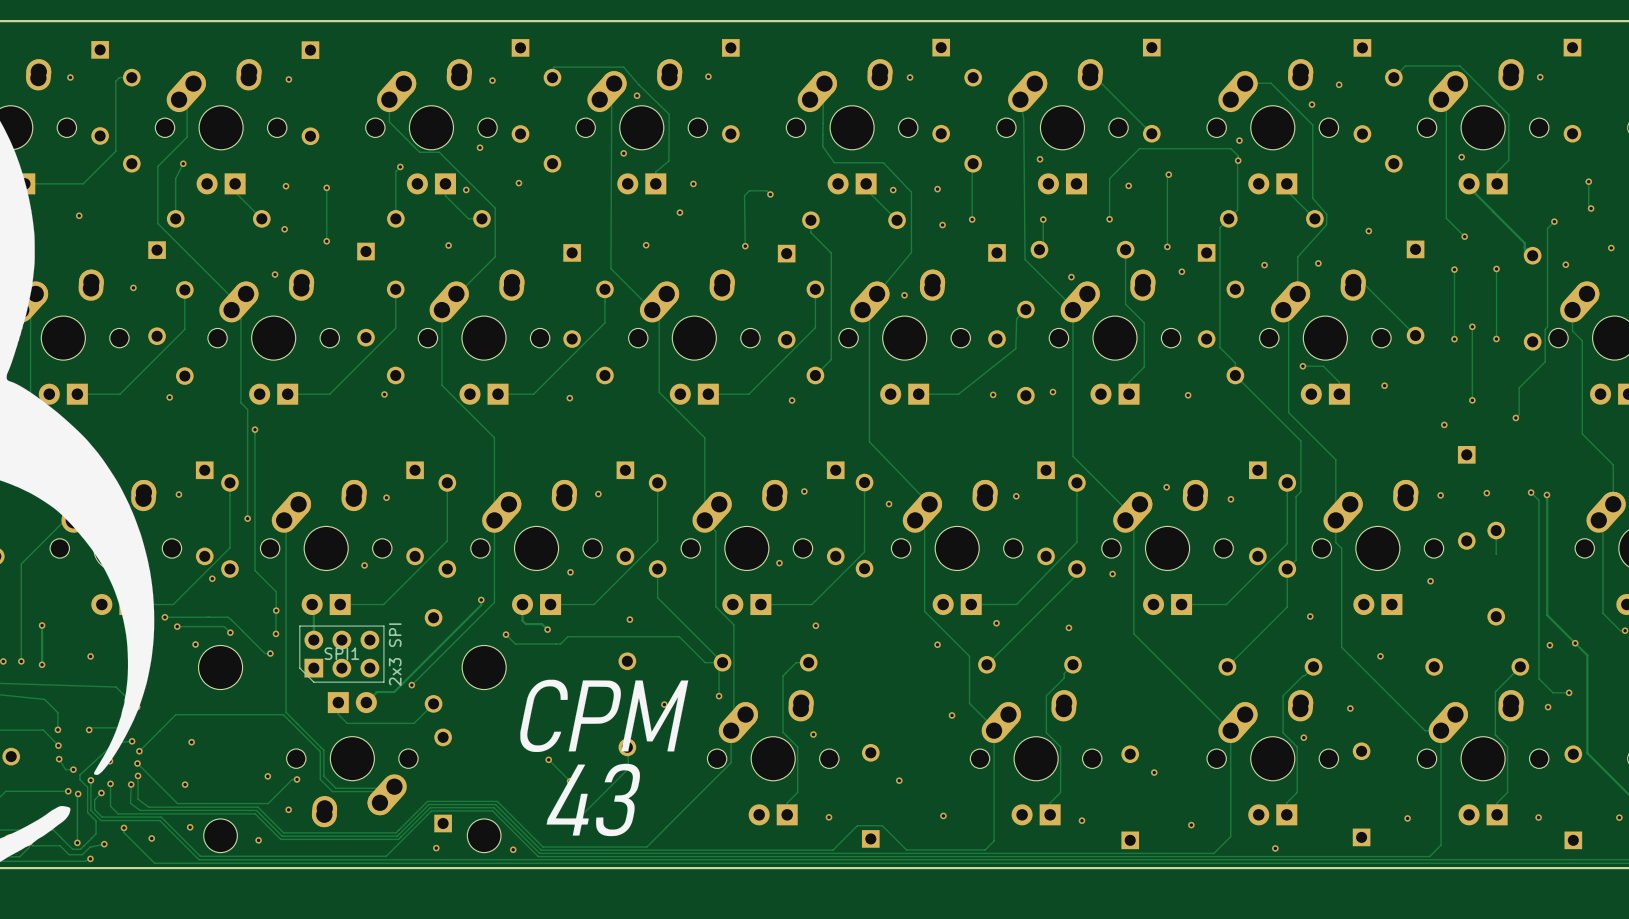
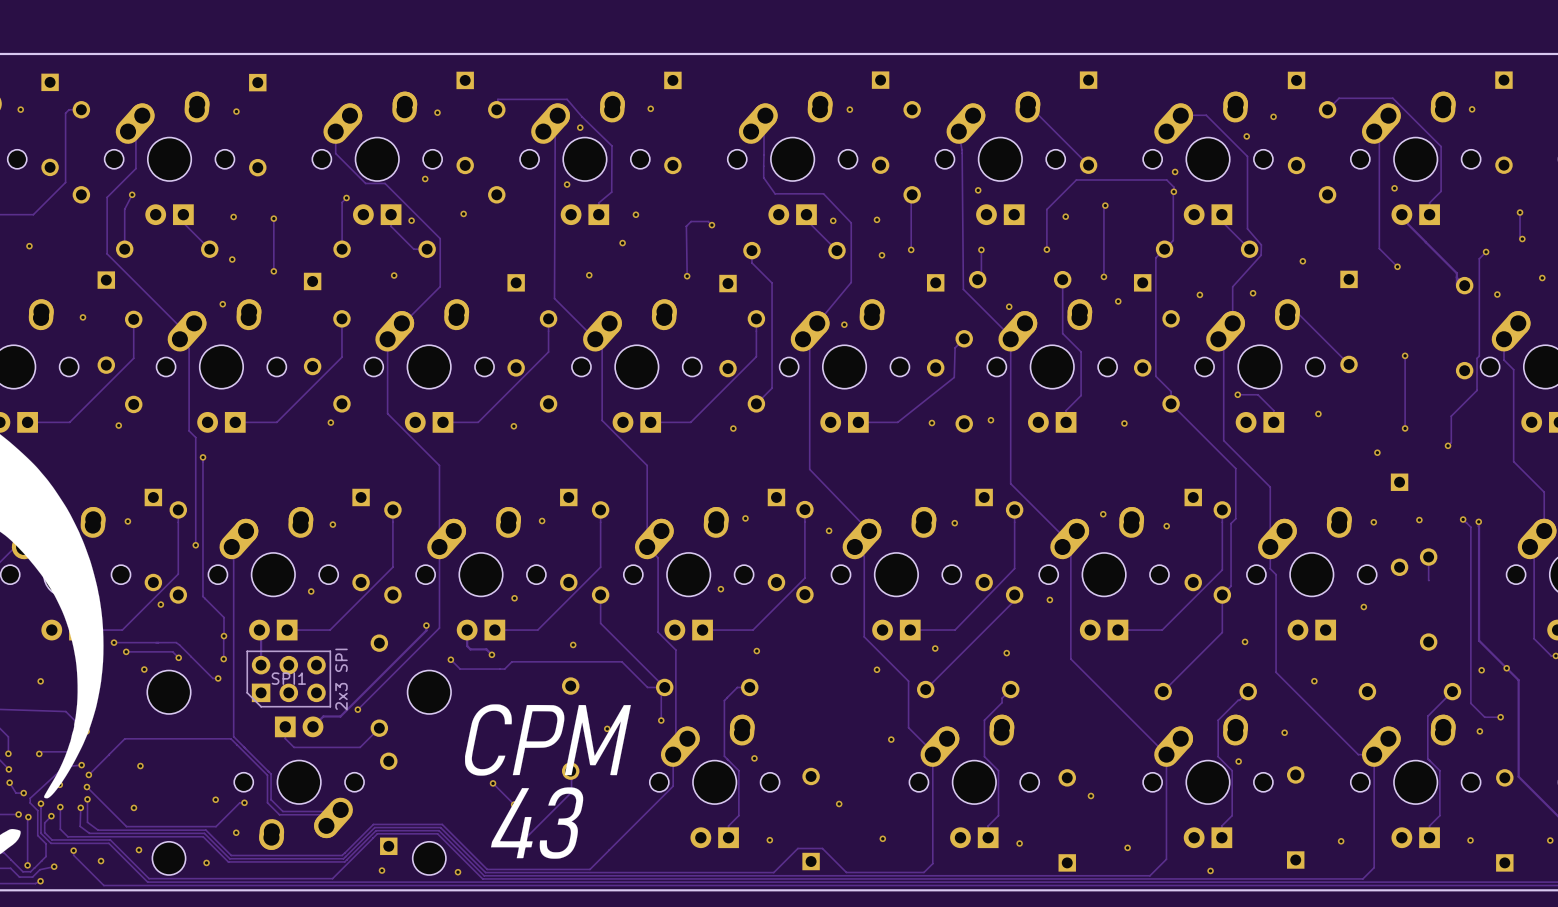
track: (1496, 268) (1496, 338) -> none
via: (1496, 268) -> none
track: (1454, 269) (1454, 339) -> none
via: (1454, 269) -> none
via: (1496, 338) -> none
via: (1454, 339) -> none

